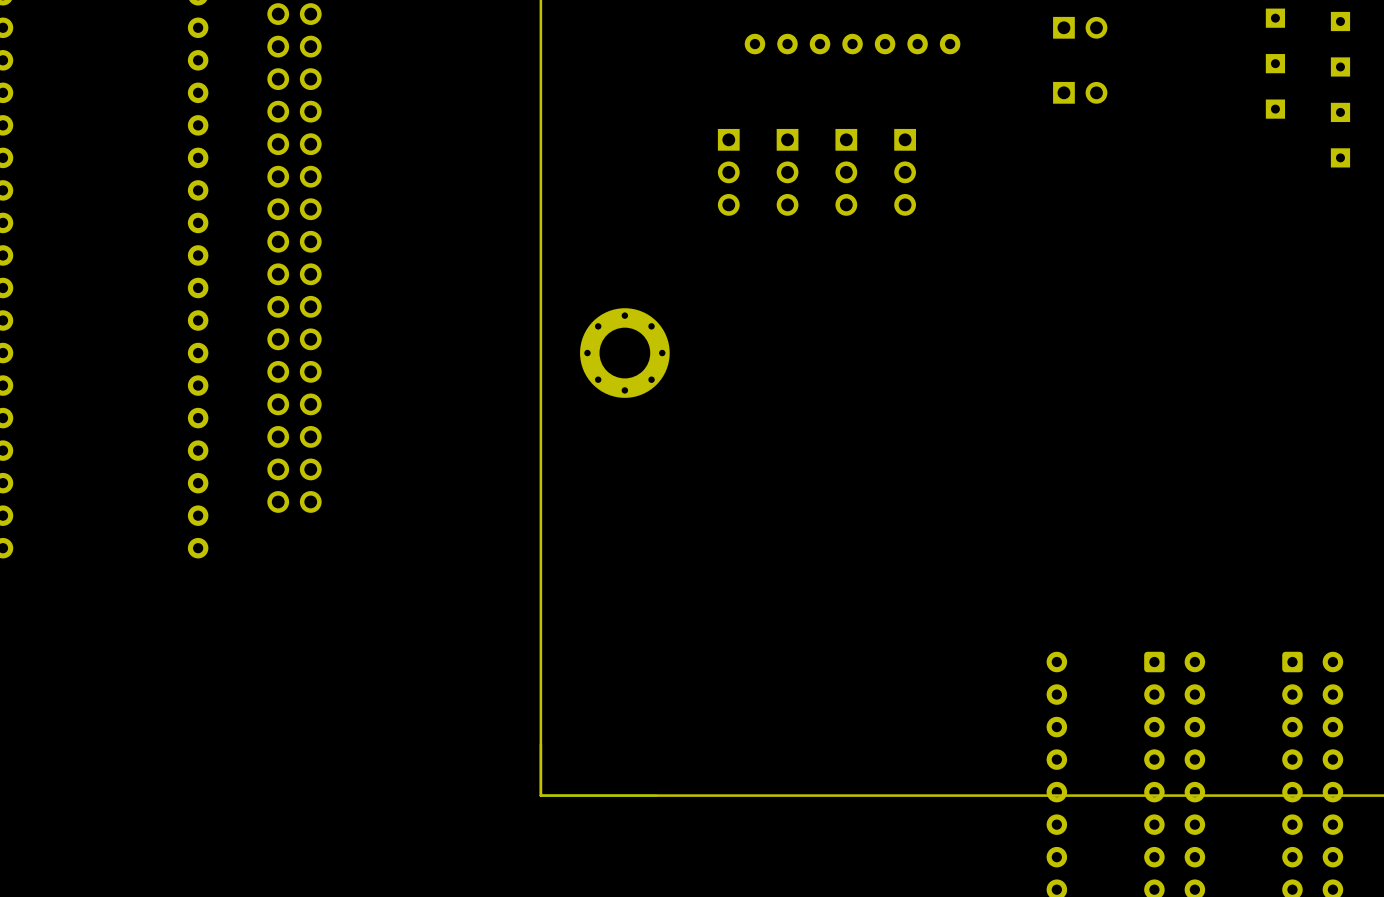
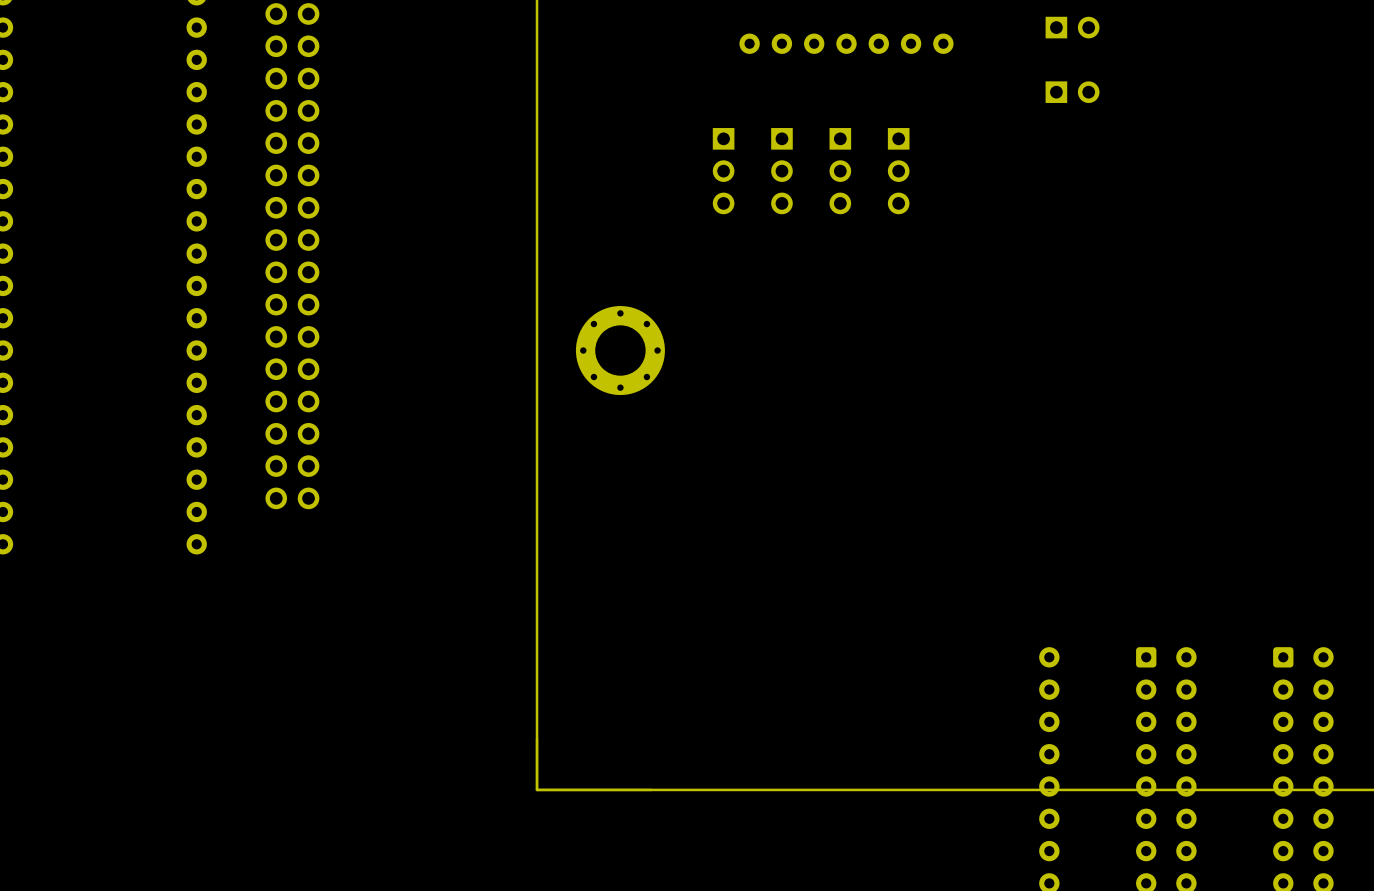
part: (1275, 18) -> none
part: (1340, 21) -> none
part: (1275, 63) -> none
part: (1340, 66) -> none
part: (1275, 109) -> none
part: (1340, 112) -> none
part: (1340, 157) -> none

